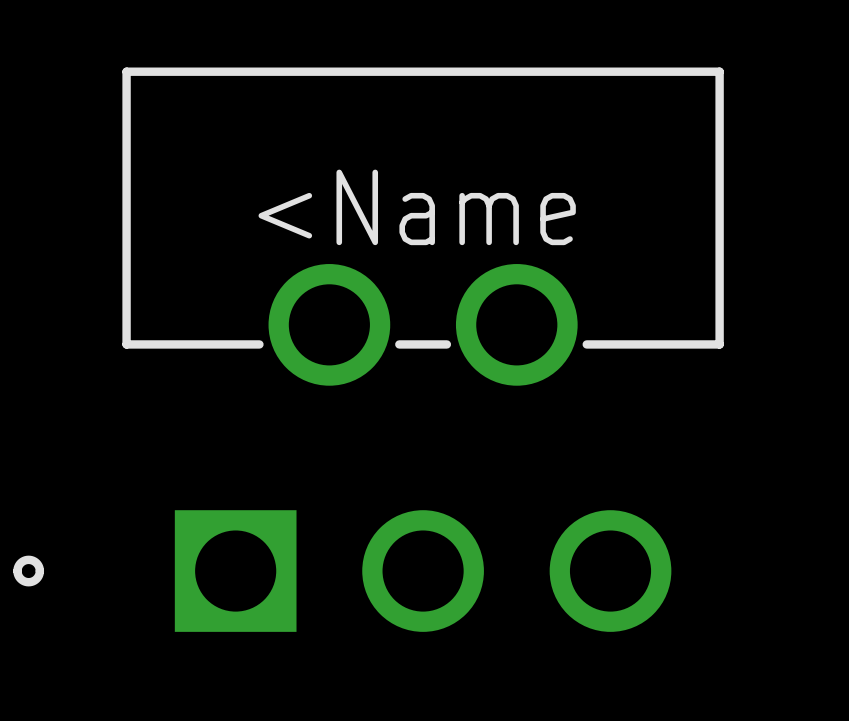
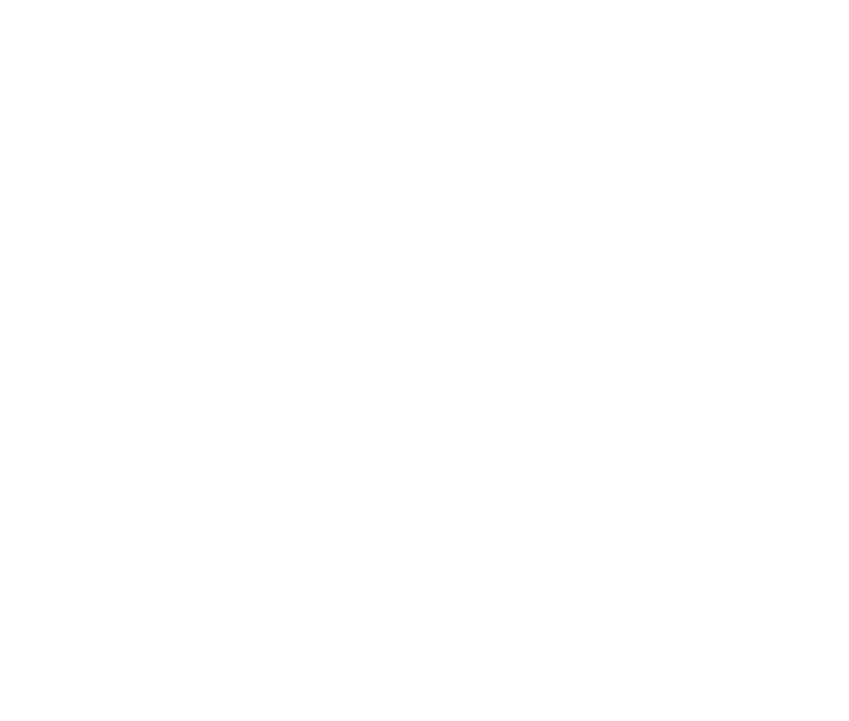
part: (368, 349) -> none

